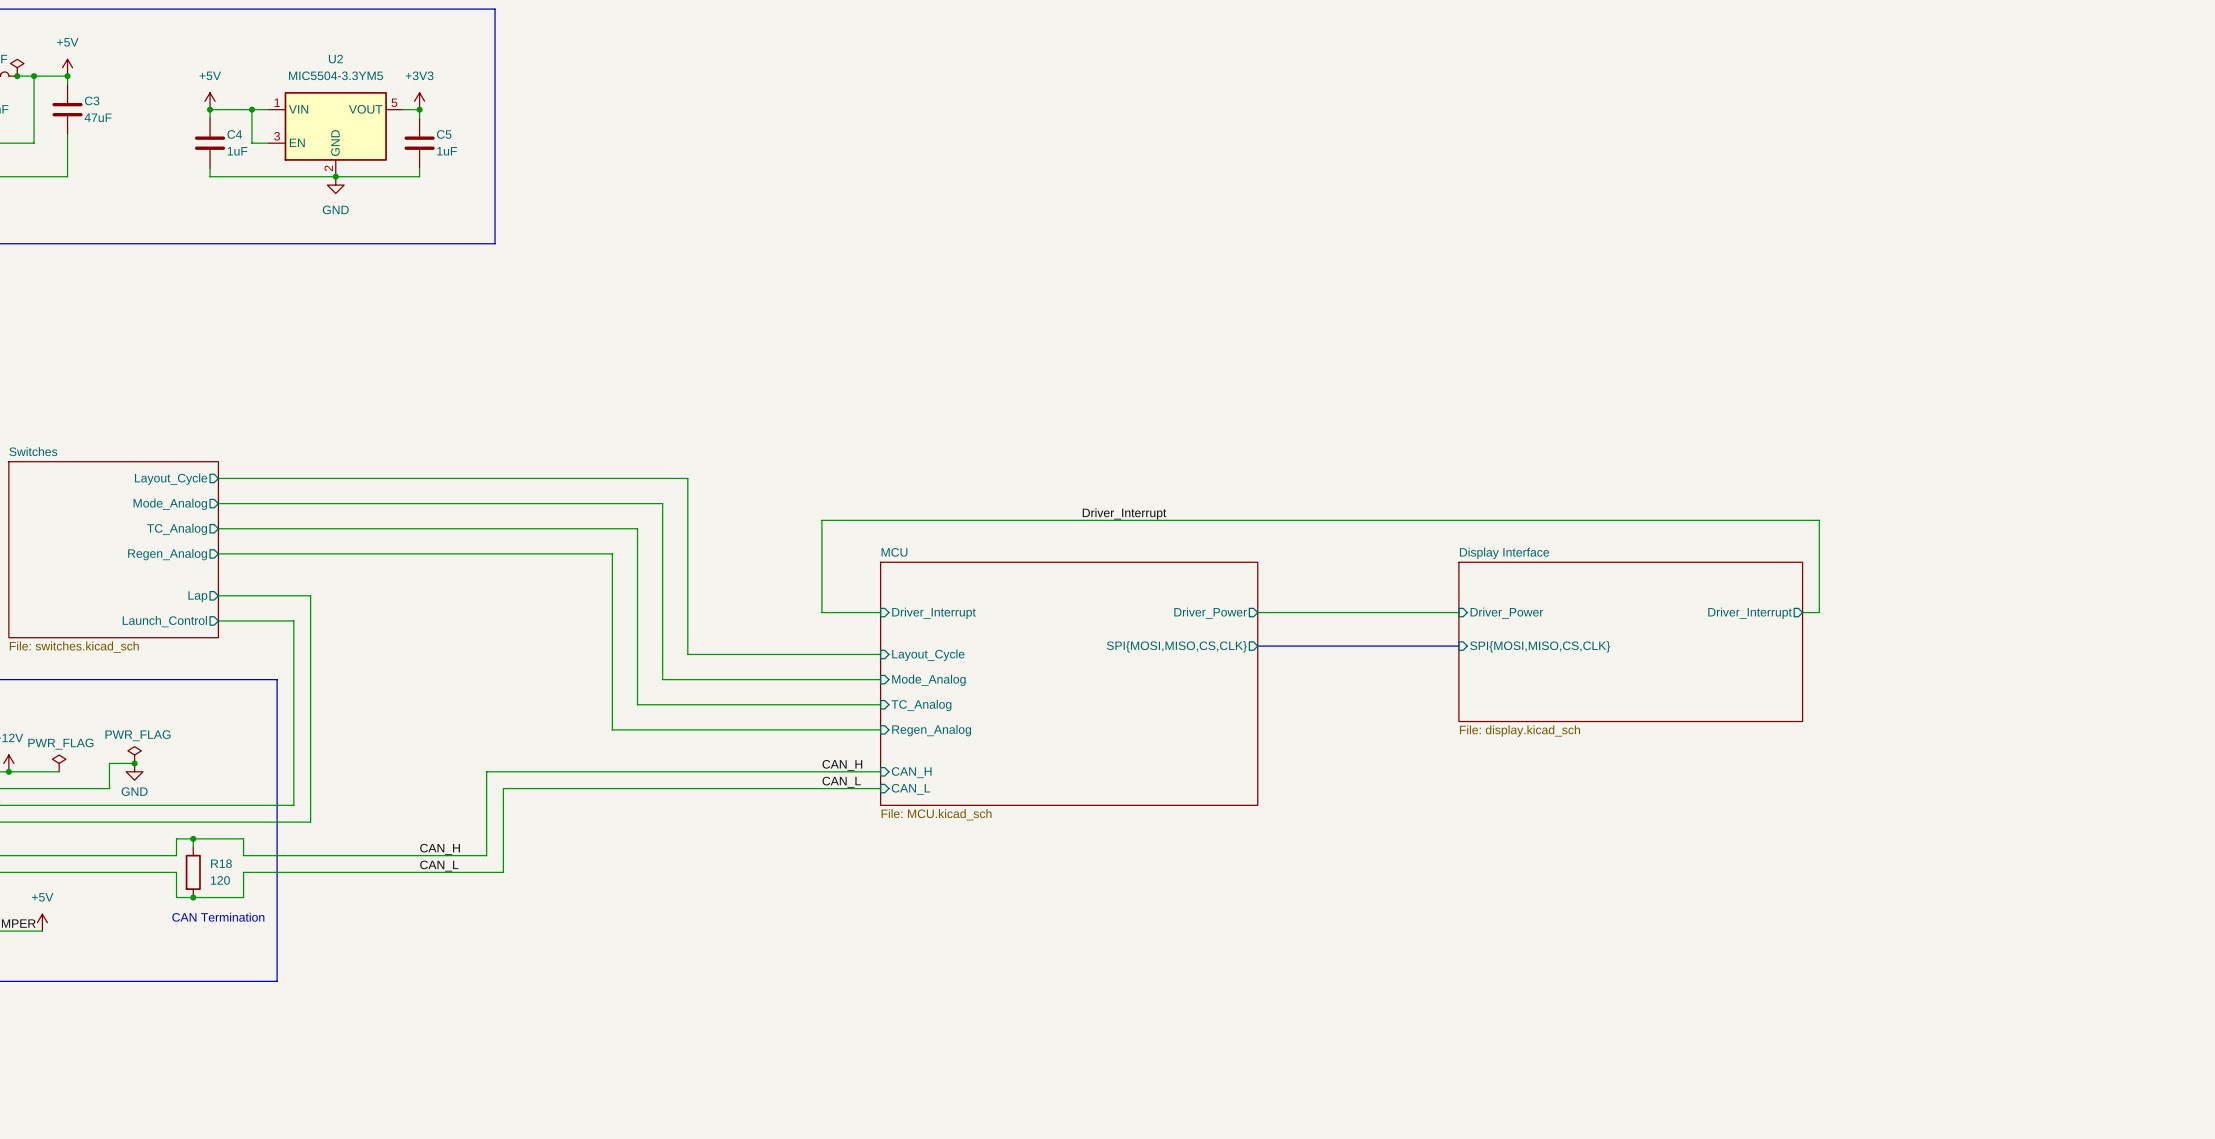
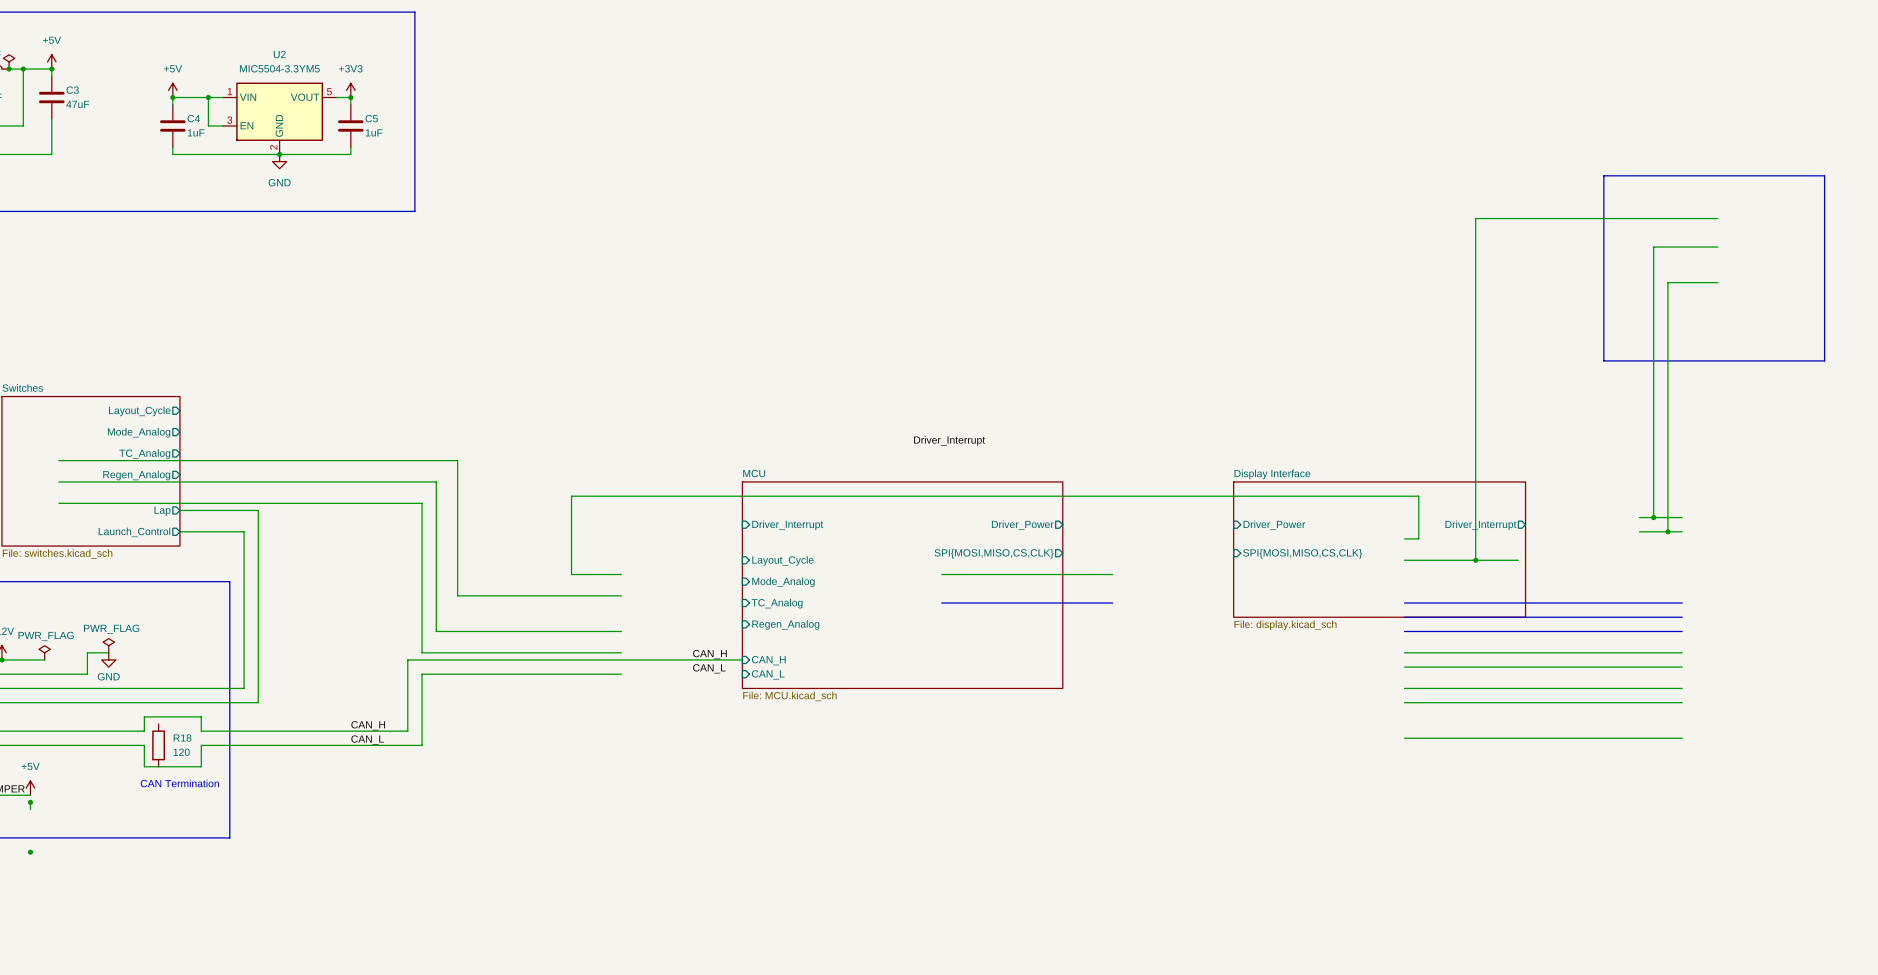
line: none -> (1603, 175) (1824, 175) (1824, 360) (1603, 360) (1603, 175)
wire: none -> (1717, 218) (1475, 218) (1475, 560)
wire: none -> (1717, 247) (1653, 247) (1653, 517)
wire: none -> (1717, 282) (1667, 282) (1667, 531)
wire: (218, 478) (687, 478) (687, 654) (880, 654) -> none
wire: (218, 503) (662, 503) (662, 679) (880, 679) -> (58, 481) (436, 481) (436, 631) (621, 631)
wire: (218, 528) (637, 528) (637, 704) (880, 704) -> none
wire: none -> (58, 460) (457, 460) (457, 595) (621, 595)
wire: (218, 553) (612, 553) (612, 729) (880, 729) -> none
wire: none -> (58, 503) (422, 503) (422, 652) (621, 652)
wire: none -> (1639, 517) (1682, 517)
junction: none -> (1653, 517)
wire: (880, 612) (821, 612) (821, 520) (1819, 520) (1819, 612) (1802, 612) -> none
wire: (1257, 612) (1458, 612) -> (941, 574) (1112, 574)
wire: none -> (1639, 531) (1682, 531)
junction: none -> (1667, 531)
wire: none -> (1404, 538) (1418, 538) (1418, 496) (571, 496) (571, 574) (621, 574)
bus: (1257, 646) (1458, 646) -> (941, 603) (1112, 603)
wire: none -> (1404, 560) (1518, 560)
junction: none -> (1475, 560)
bus: none -> (1404, 603) (1682, 603)
bus: none -> (1404, 617) (1682, 617)
bus: none -> (1404, 631) (1682, 631)
junction: (134, 763) -> none
wire: none -> (1404, 652) (1682, 652)
wire: none -> (1404, 667) (1682, 667)
wire: (738, 788) (880, 788) -> none
wire: none -> (1404, 688) (1682, 688)
wire: none -> (1404, 702) (1682, 702)
wire: (193, 838) (193, 847) -> none
junction: (193, 838) -> none
wire: none -> (1404, 738) (1682, 738)
junction: (193, 897) -> none
wire: none -> (30, 802) (30, 809)
junction: none -> (30, 802)
junction: none -> (30, 852)

